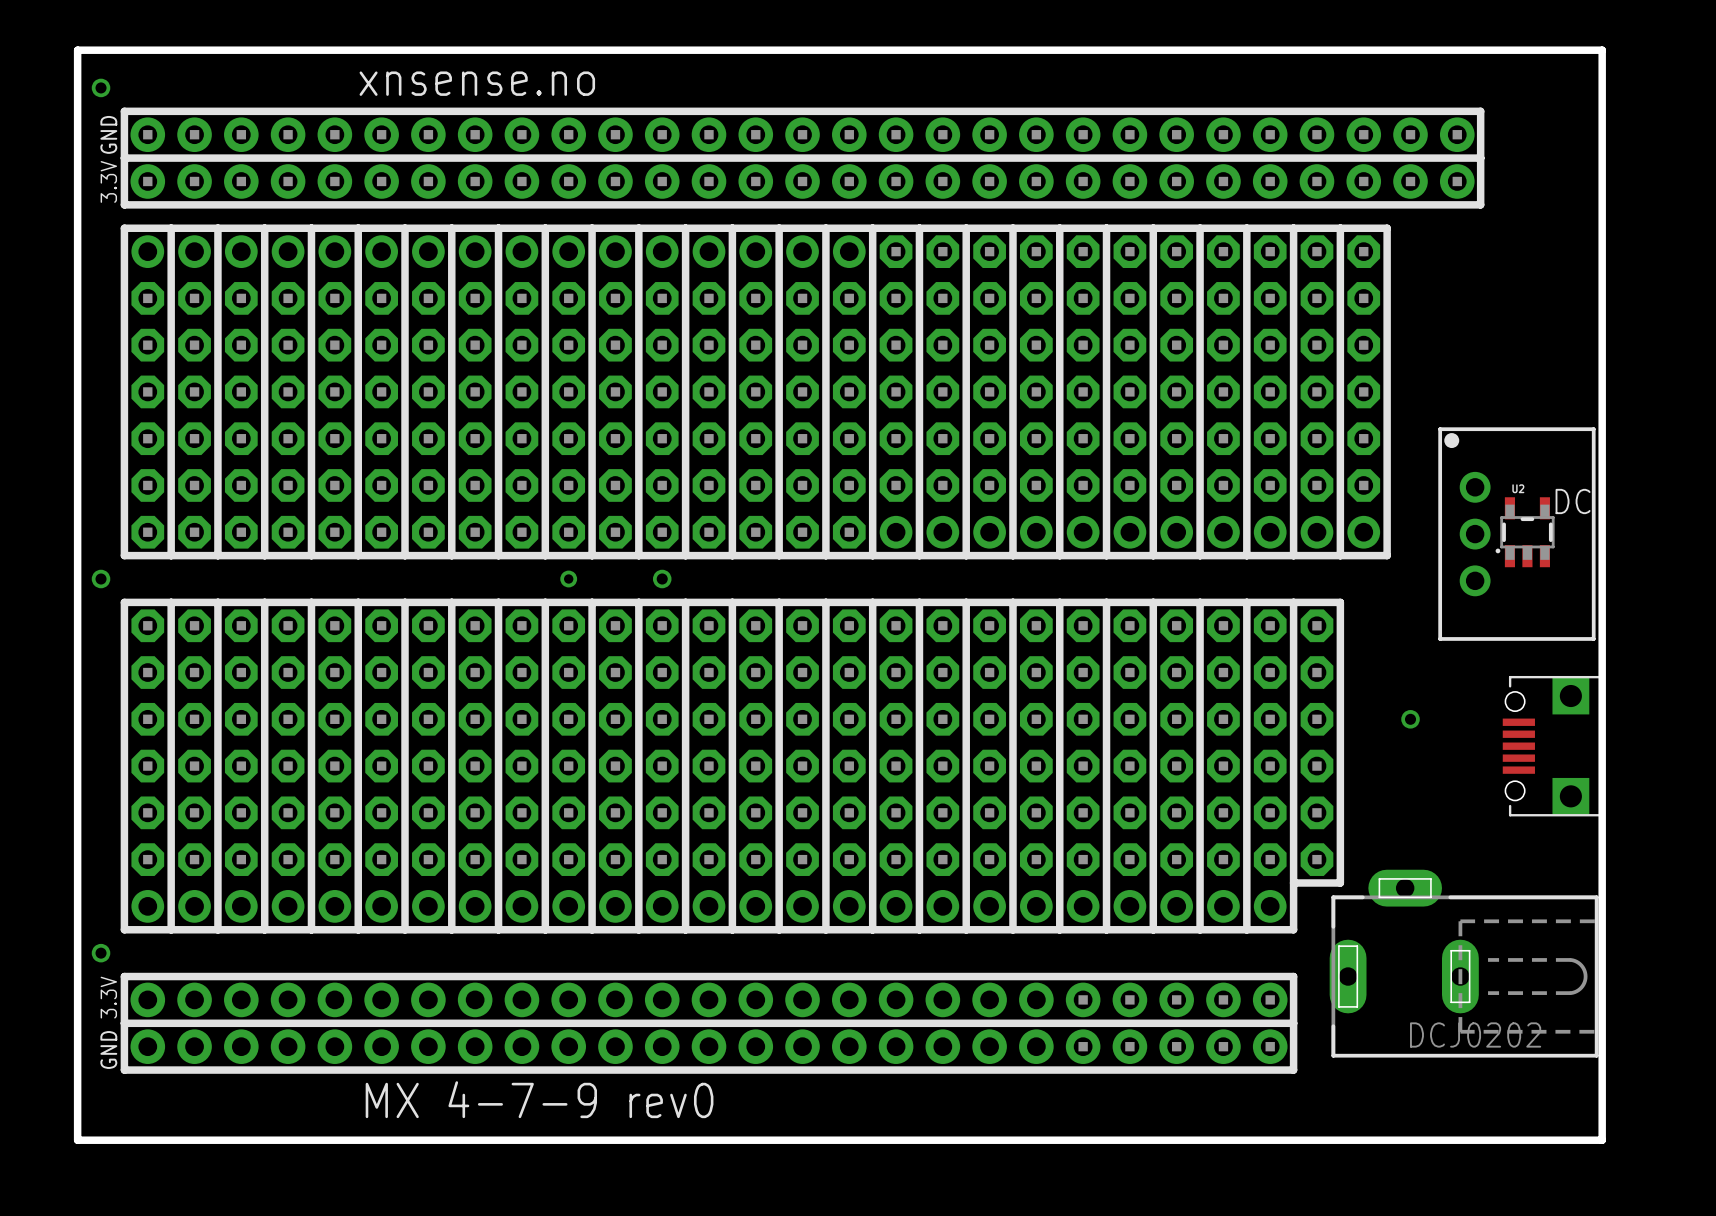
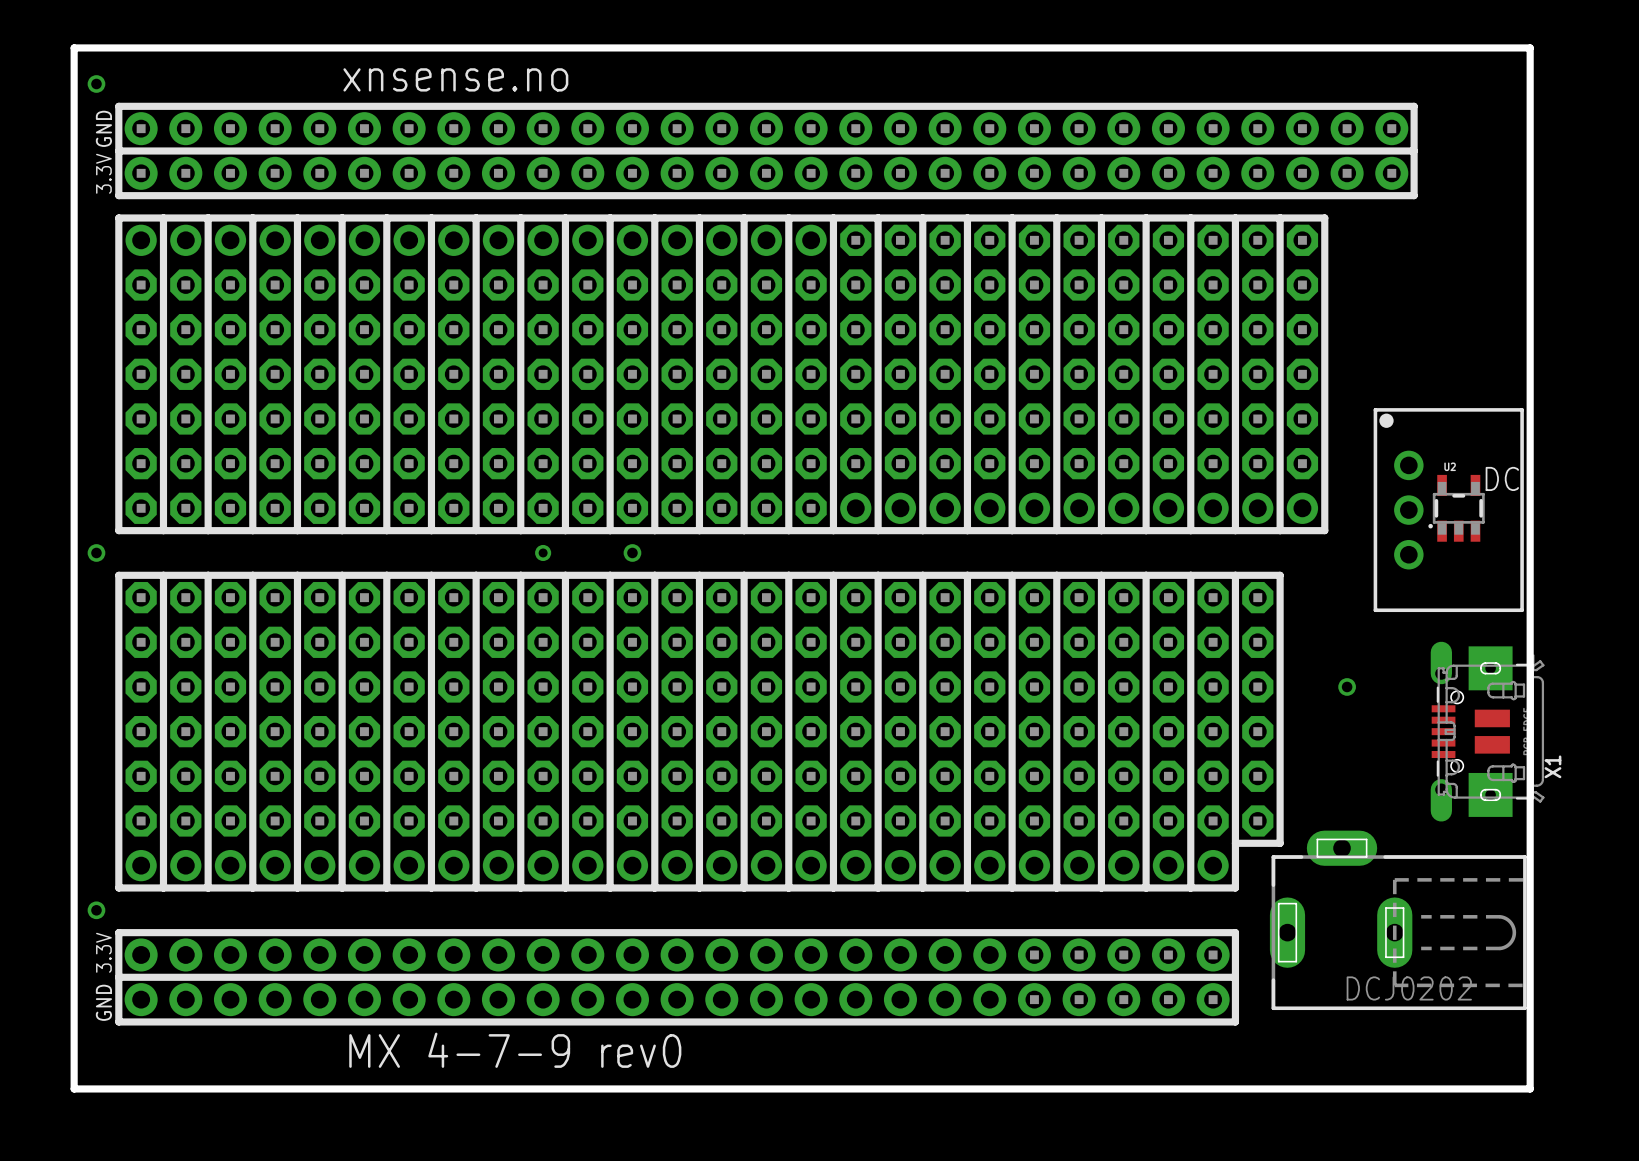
part: (1553, 746) -> none
X1: none -> (1487, 731)

